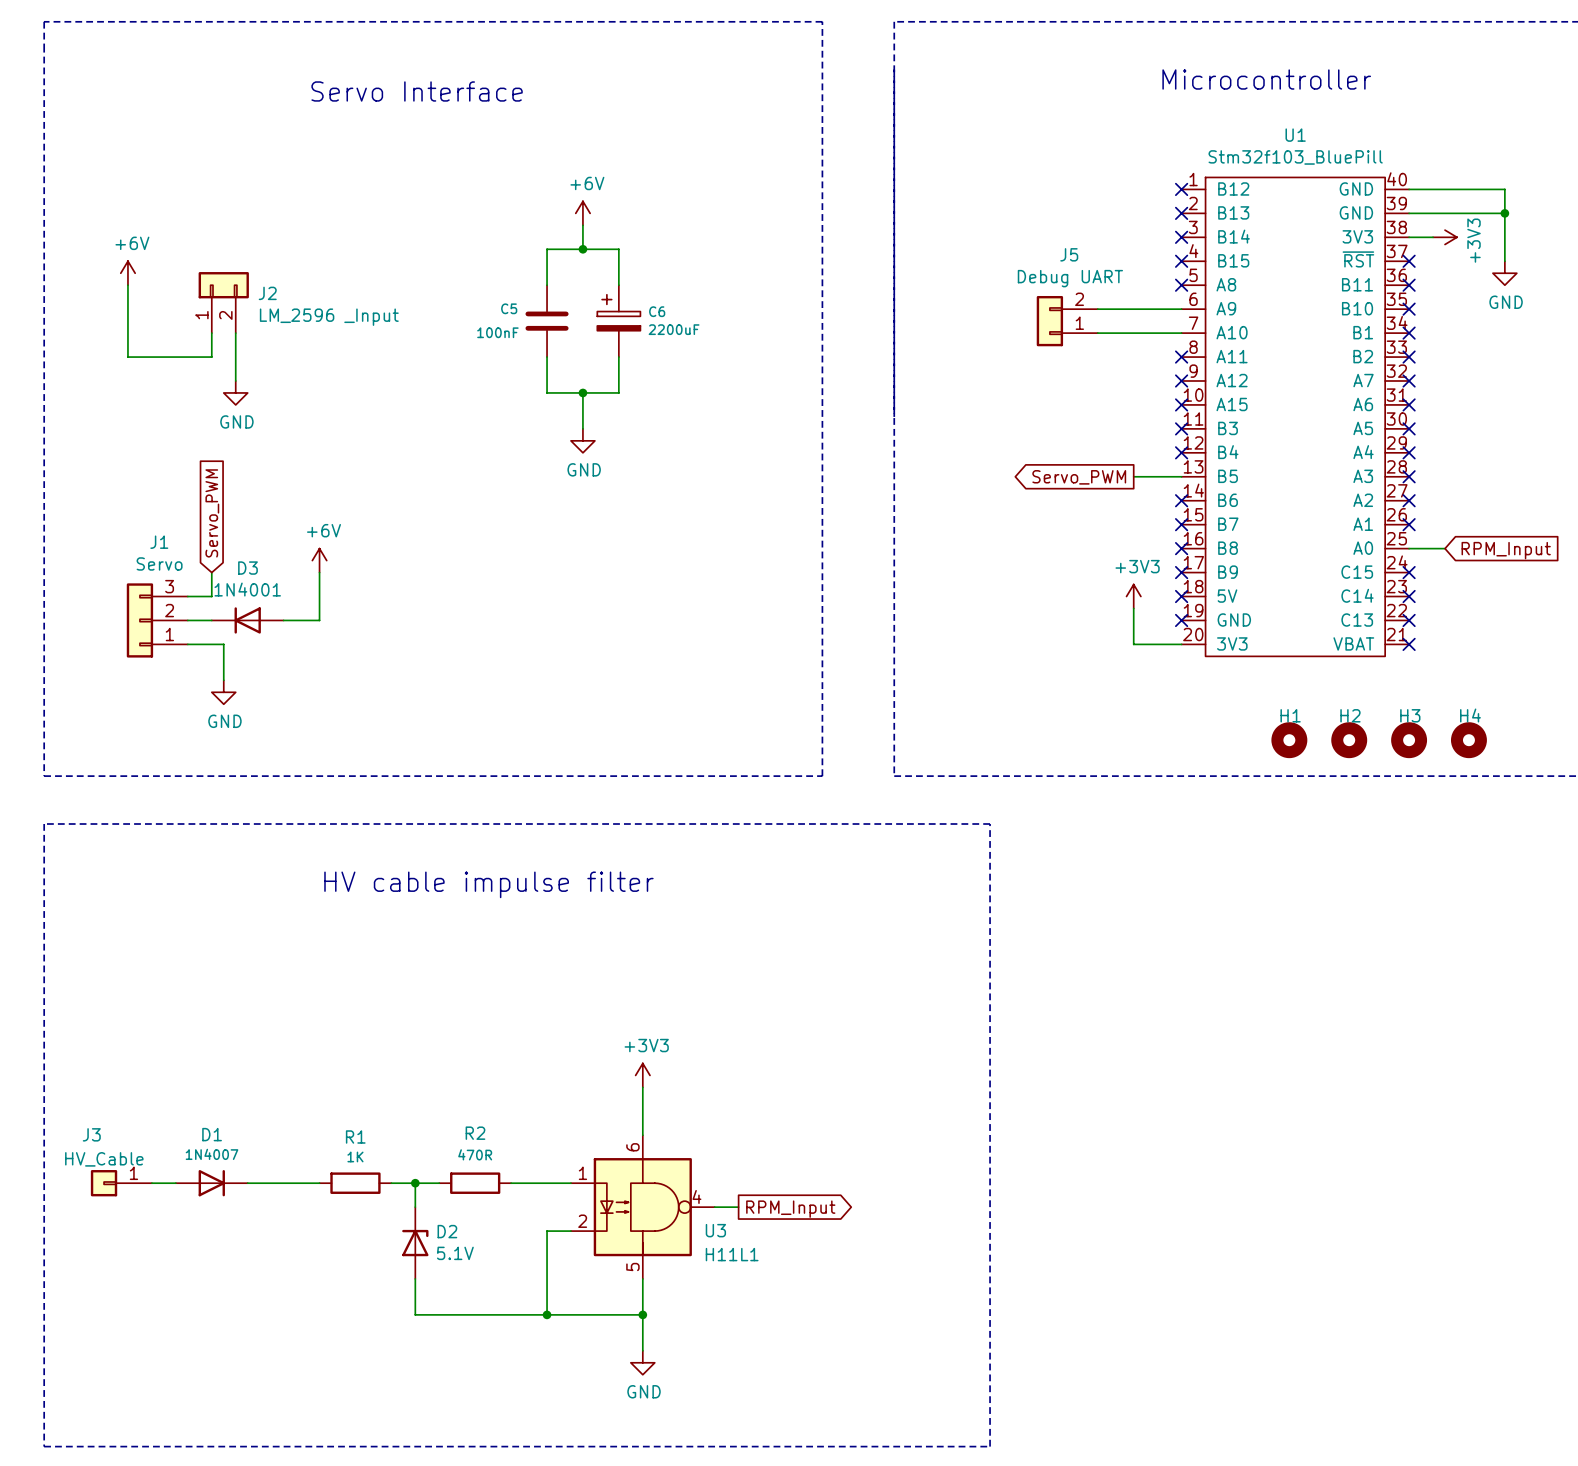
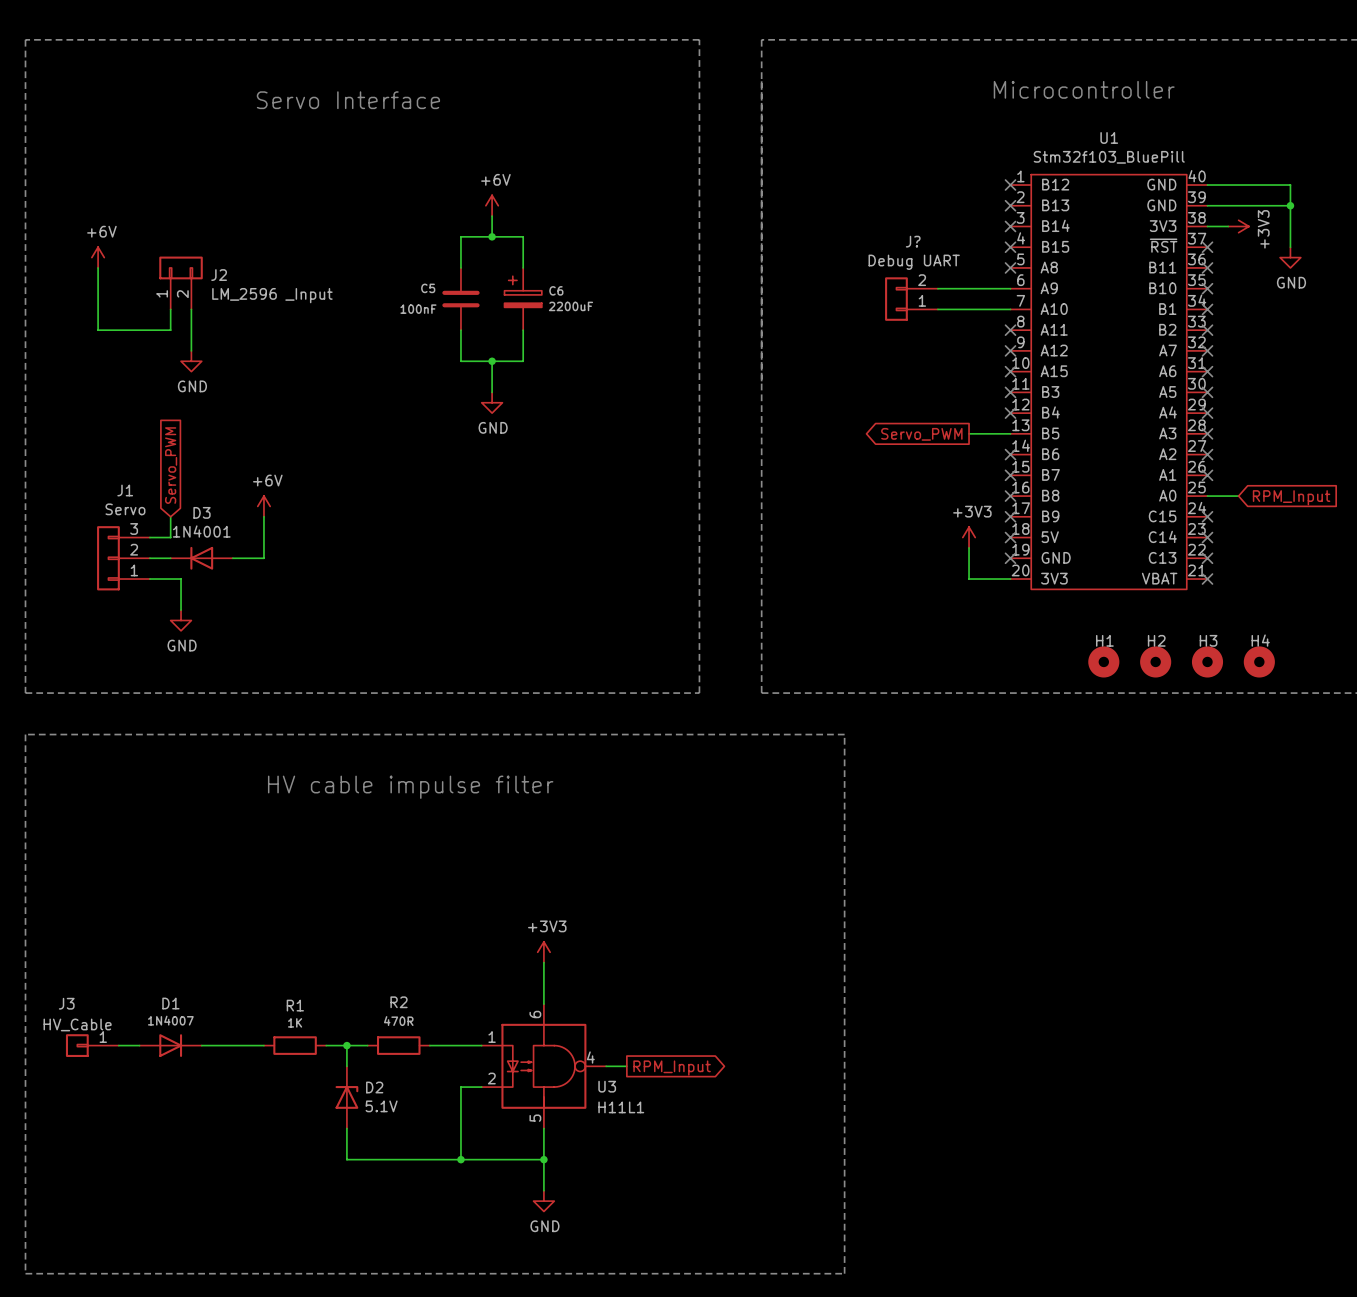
J5 name: J5 (1069, 254) -> J? (913, 241)

